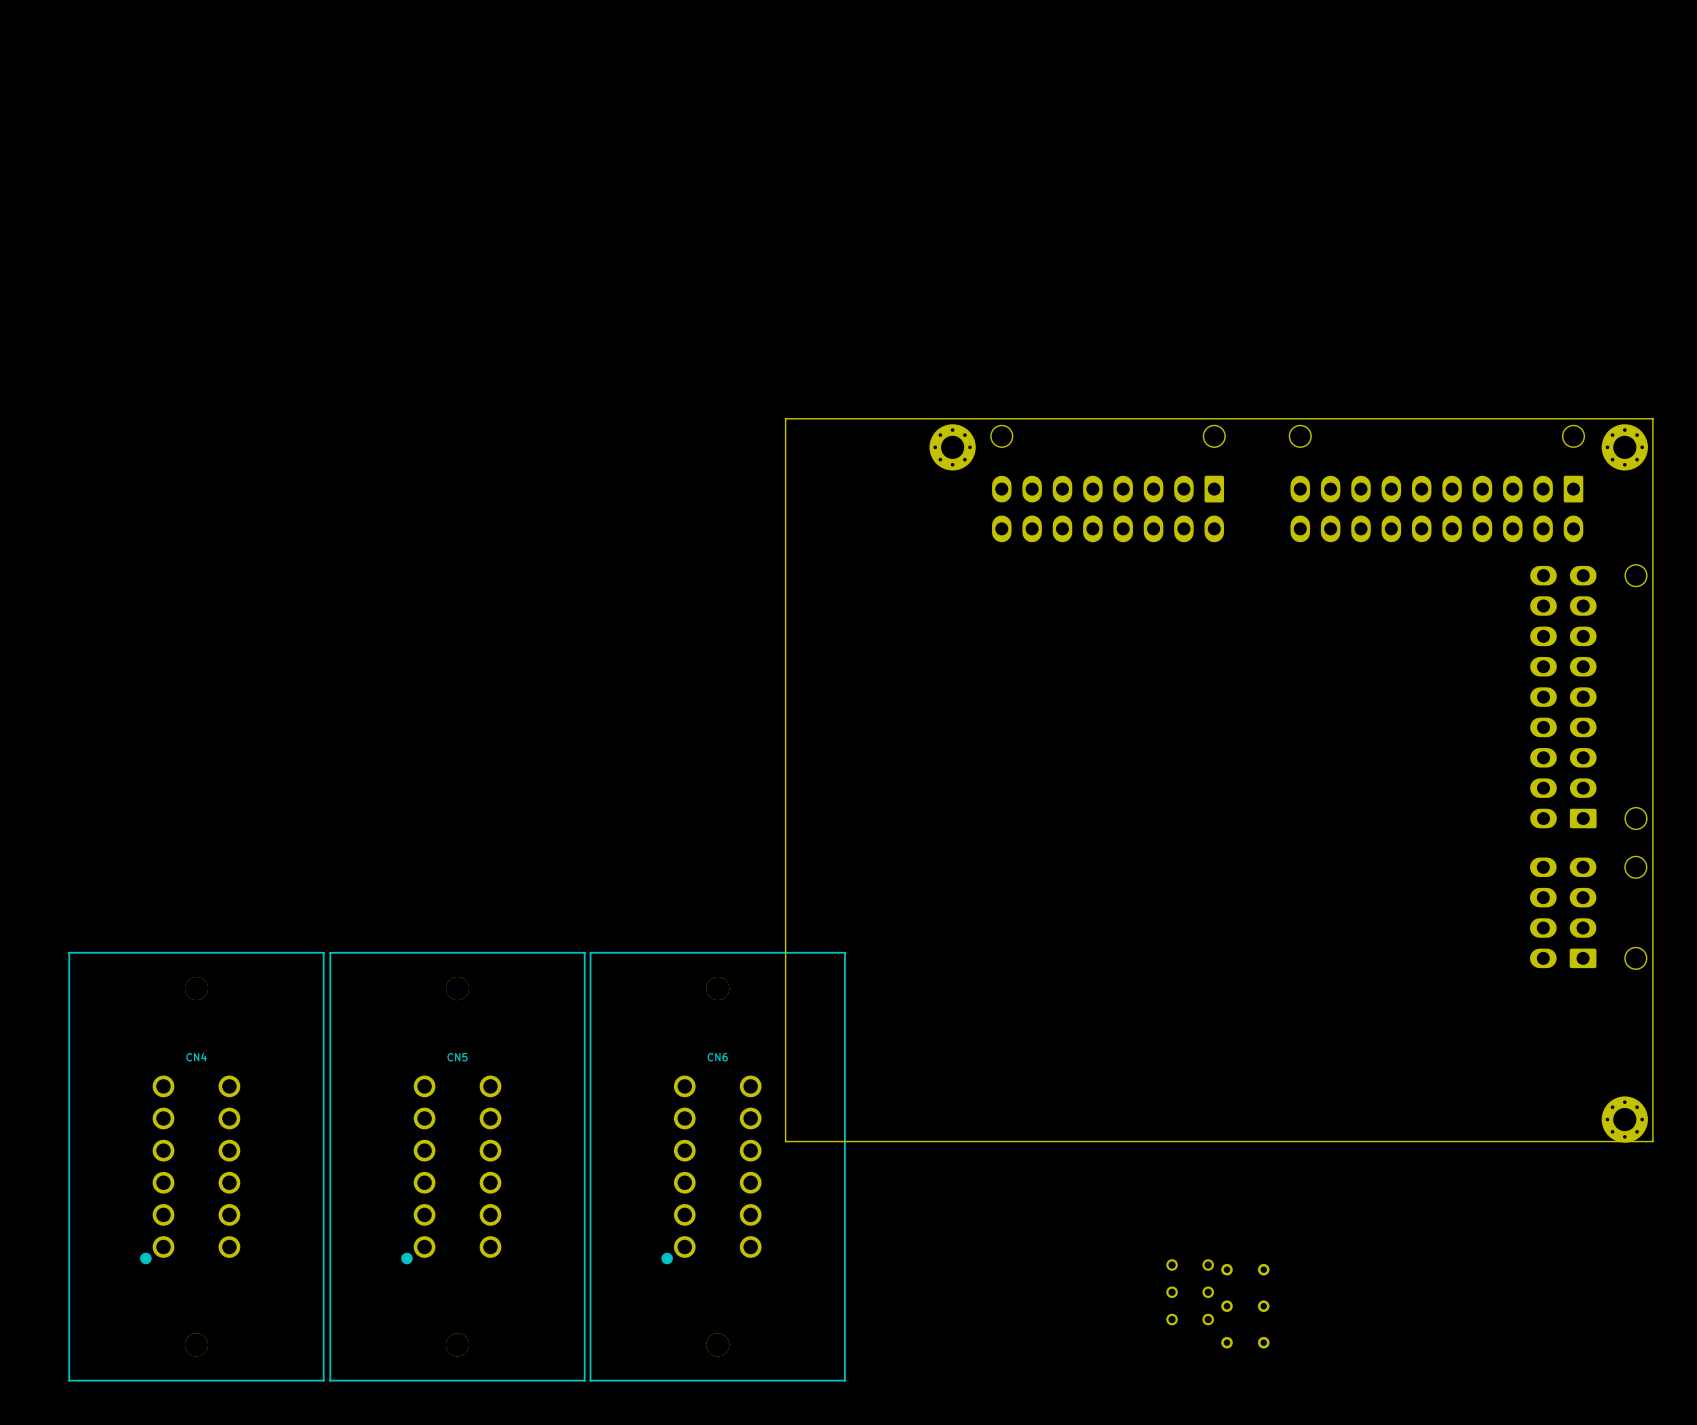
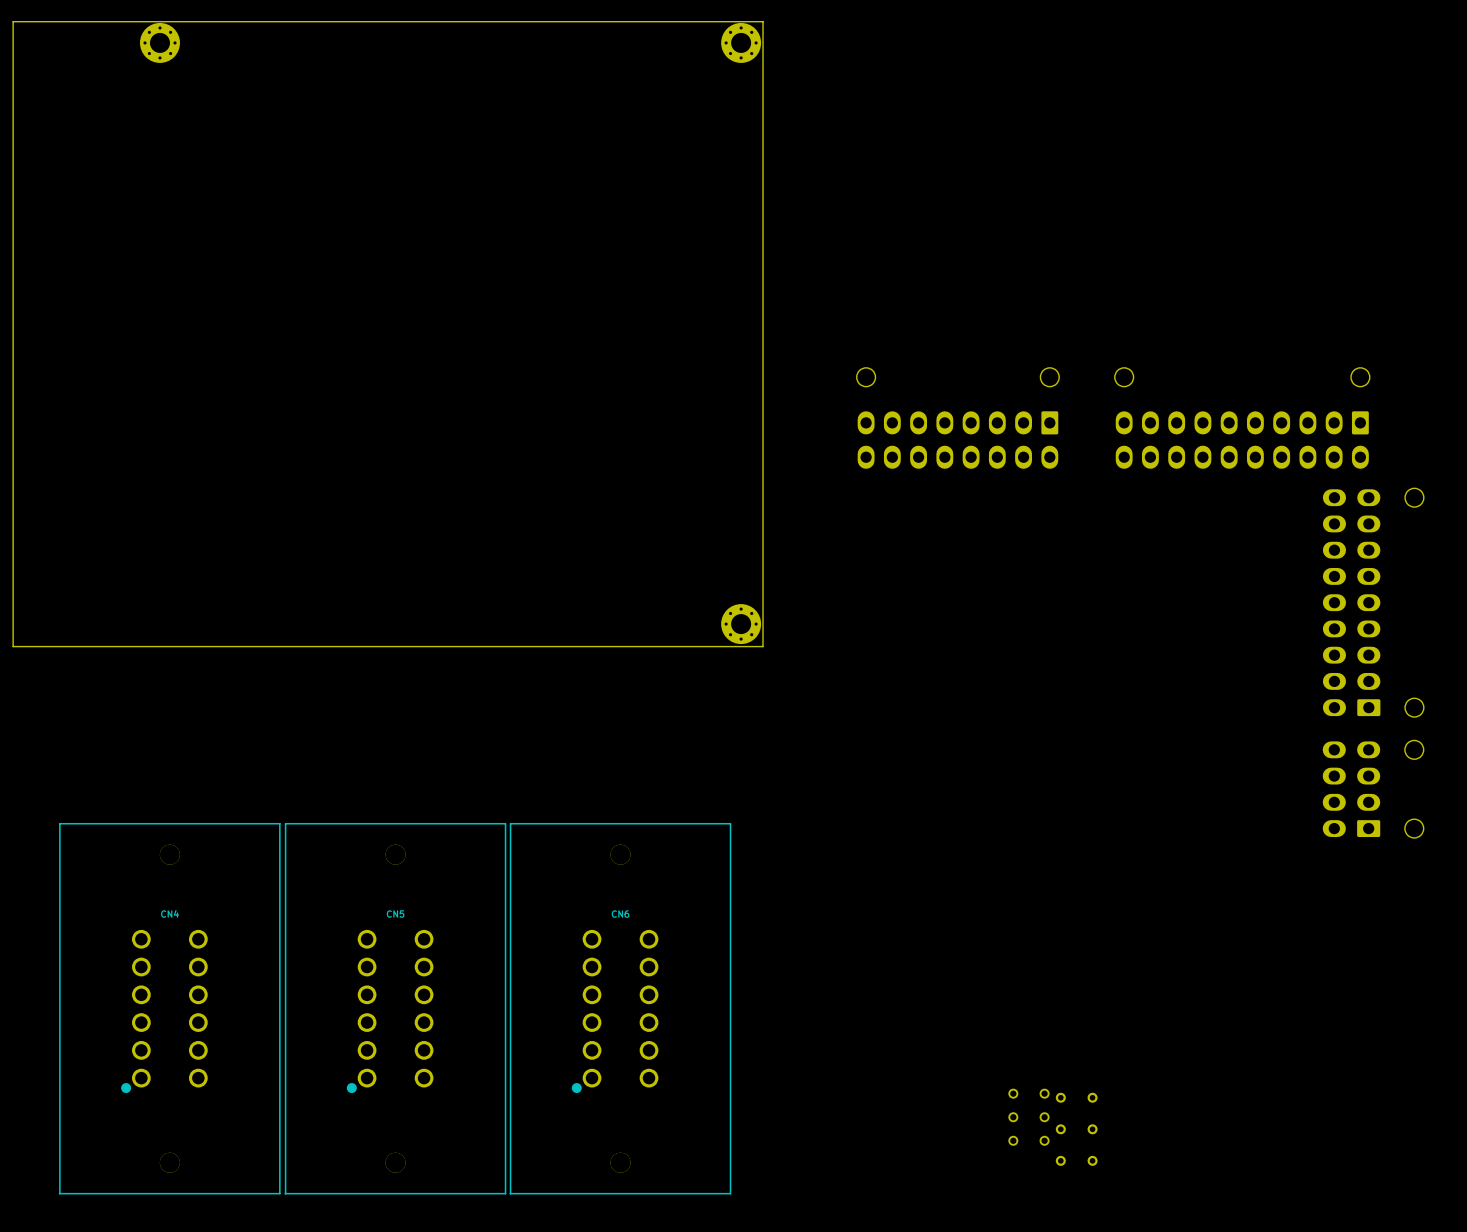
board edge: none -> (763, 21) (13, 21) (13, 646) (763, 646) (763, 21)
part: none -> (159, 42)
part: none -> (741, 42)
board edge: (1652, 418) (785, 418) (785, 1141) (1652, 1141) (1652, 418) -> none
part: (952, 447) -> none
part: (1624, 447) -> none
part: none -> (741, 624)
part: (1624, 1119) -> none

